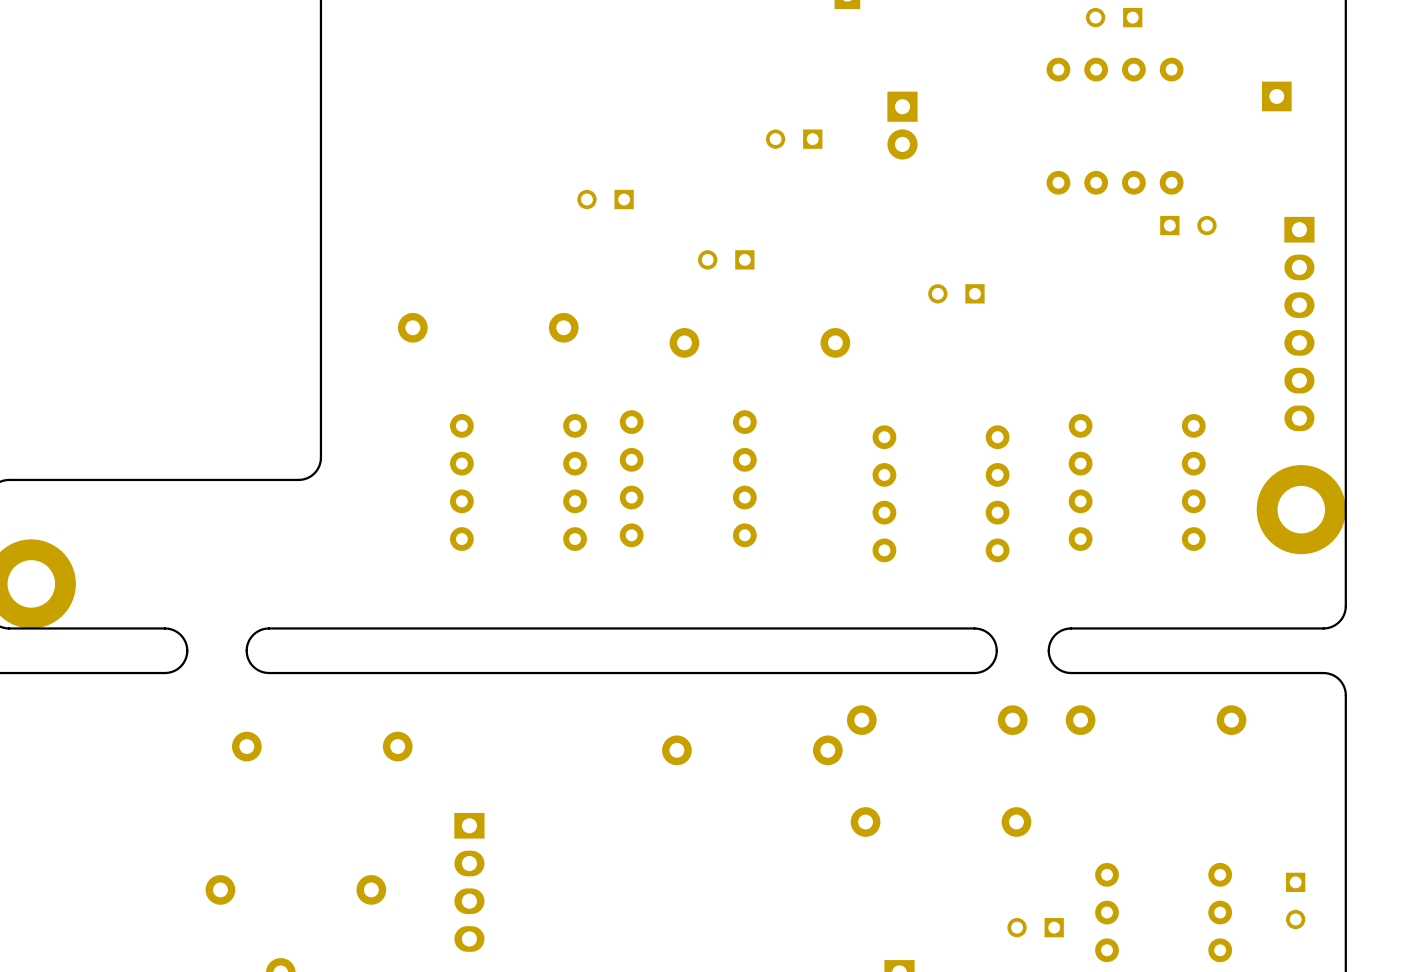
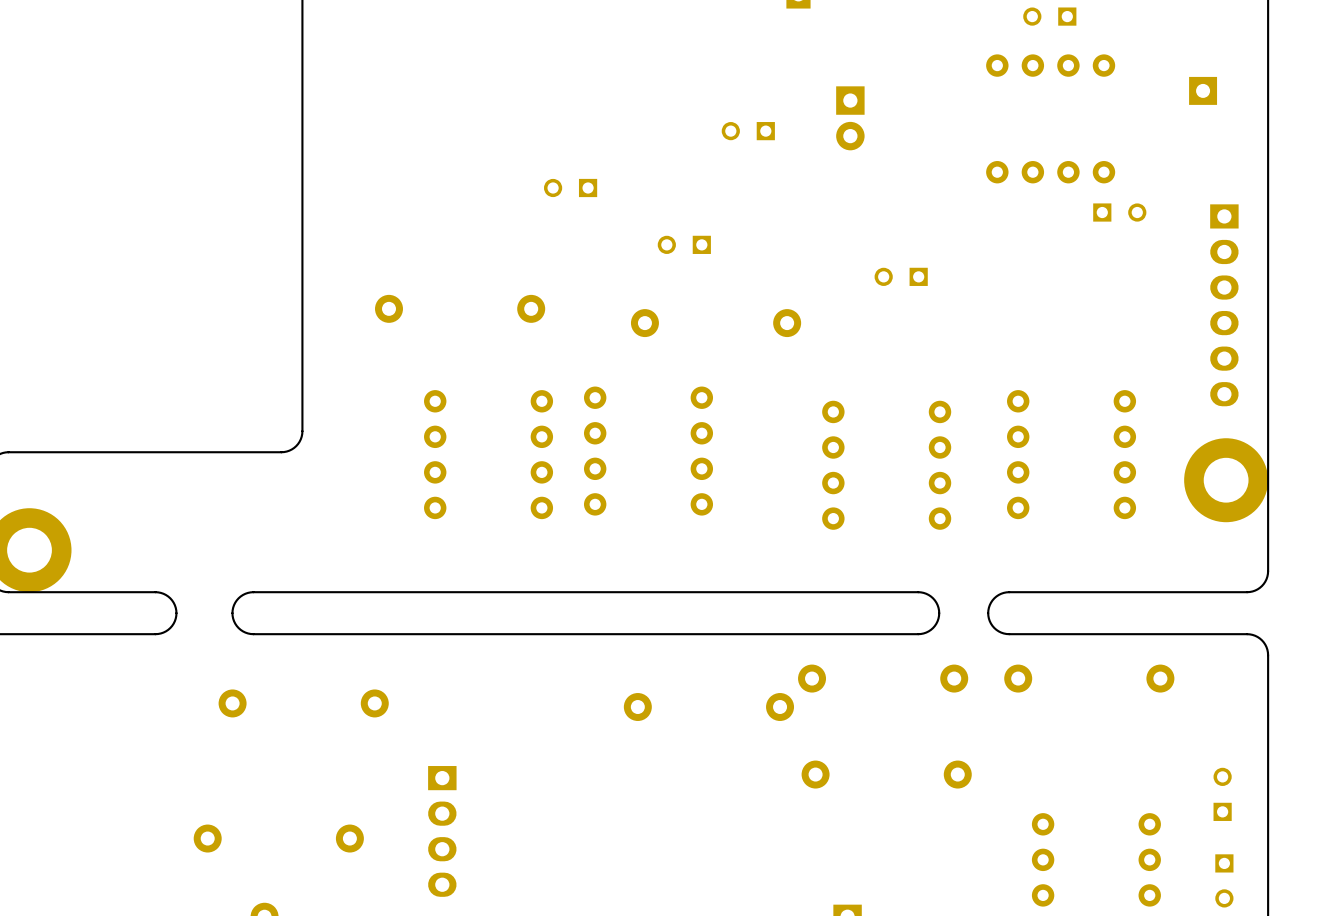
part: none -> (1222, 794)
part: (1295, 900) -> none
part: (1035, 927) -> none
part: none -> (1224, 880)

